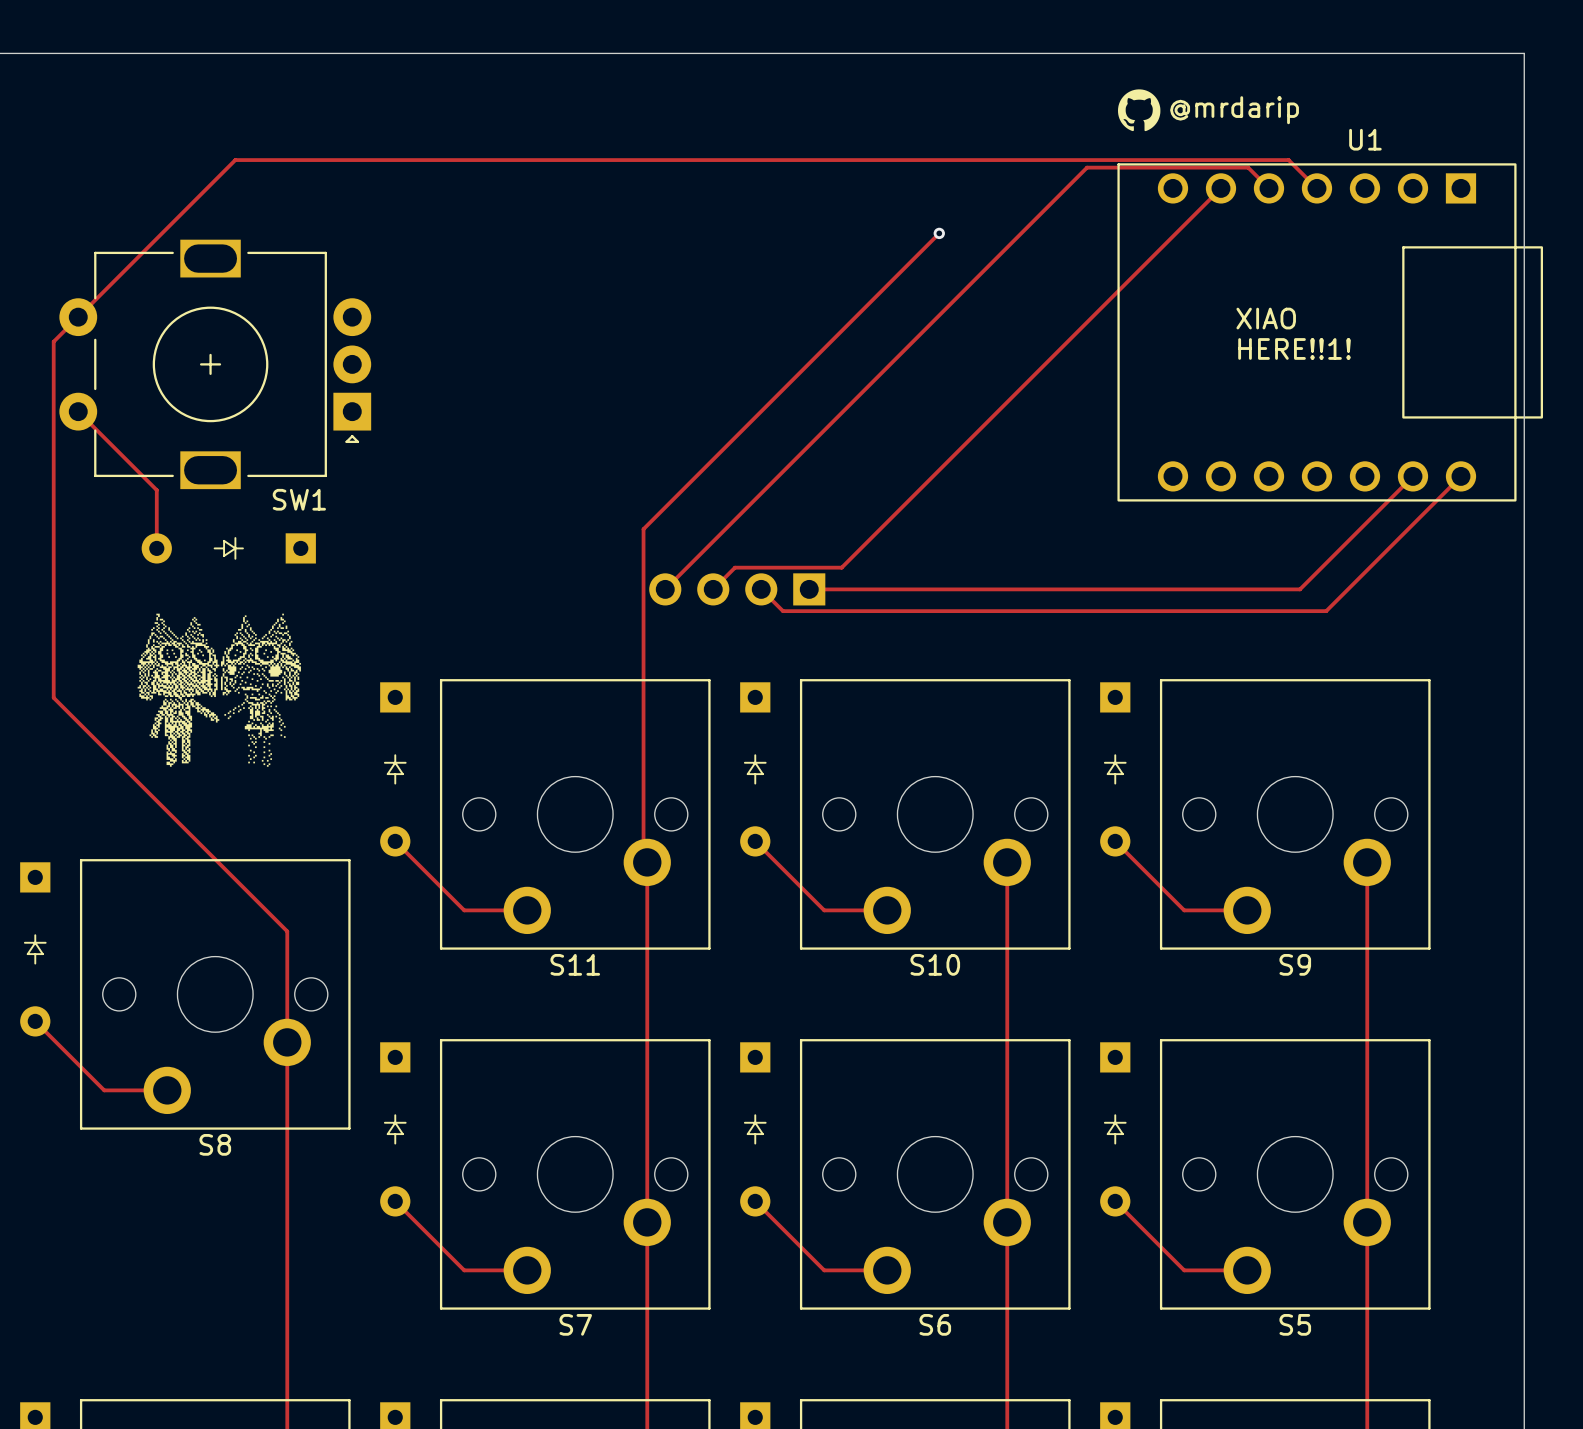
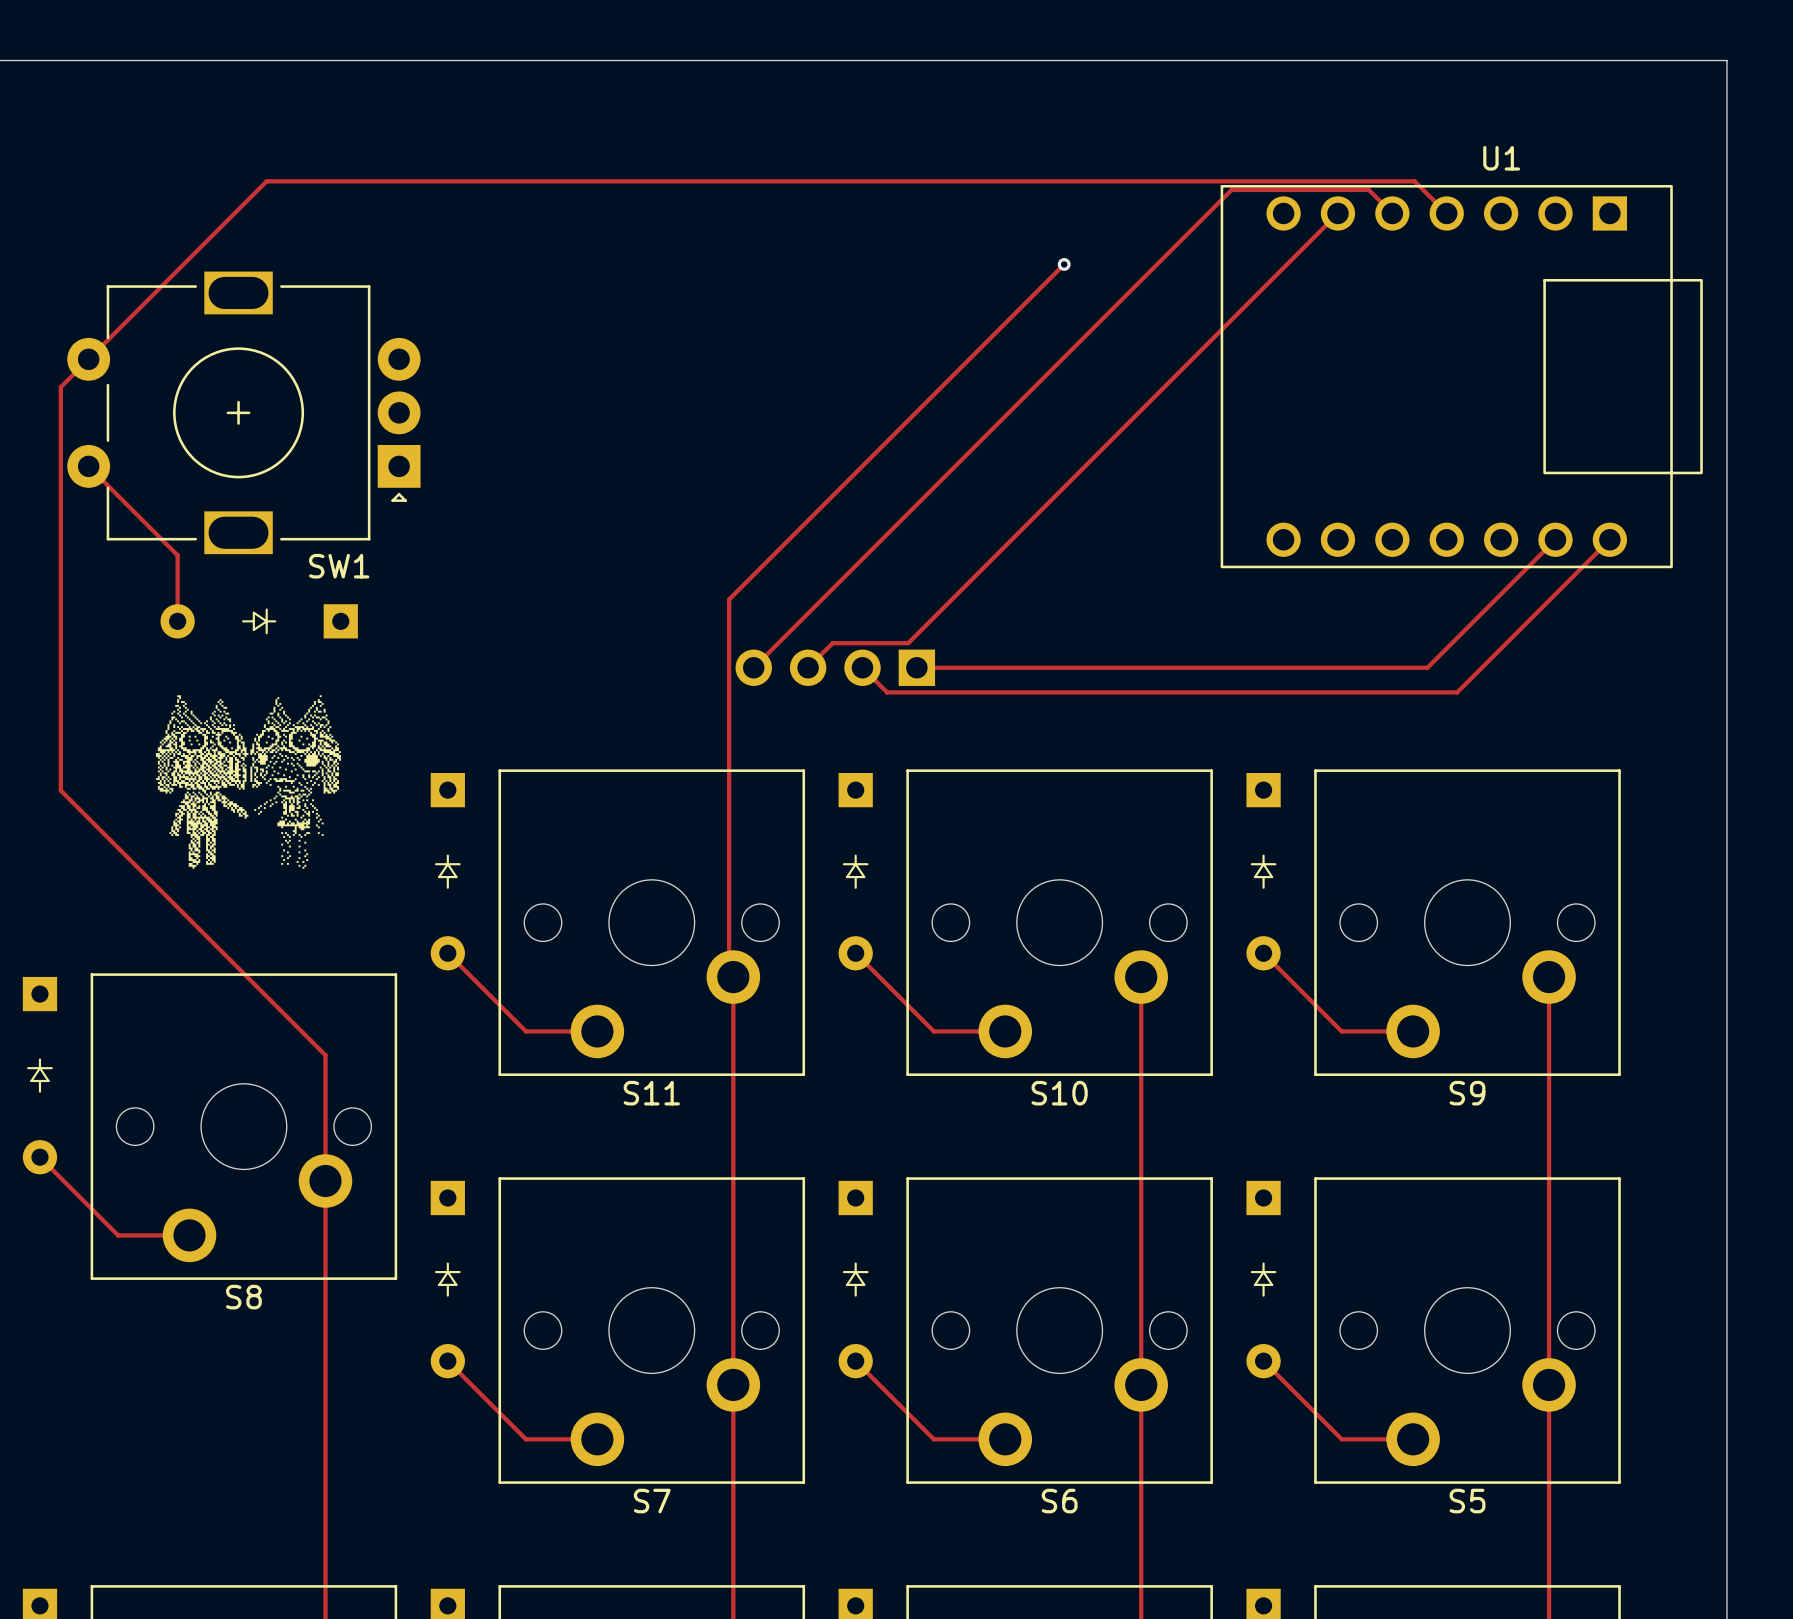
drawing: [1117, 89, 1161, 132] -> none
text: @mrdarip (1234, 110) -> none
track: (1248, 160) (1288, 160) (1316, 188) -> (1414, 181) (1446, 213)
track: (1208, 167) (1248, 167) (1268, 188) -> (1368, 189) (1392, 213)
track: (1220, 188) (841, 567) (801, 567) -> (1337, 213) (908, 643)
text: XIAO (1266, 318) -> none
U1 position: (1330, 332) -> (1461, 376)
text: HERE!!1! (1294, 348) -> none
track: (1412, 476) (1300, 589) (1259, 589) -> (1555, 539) (1427, 667)
track: (1460, 476) (1326, 611) (1286, 611) -> (1609, 539) (1457, 692)

